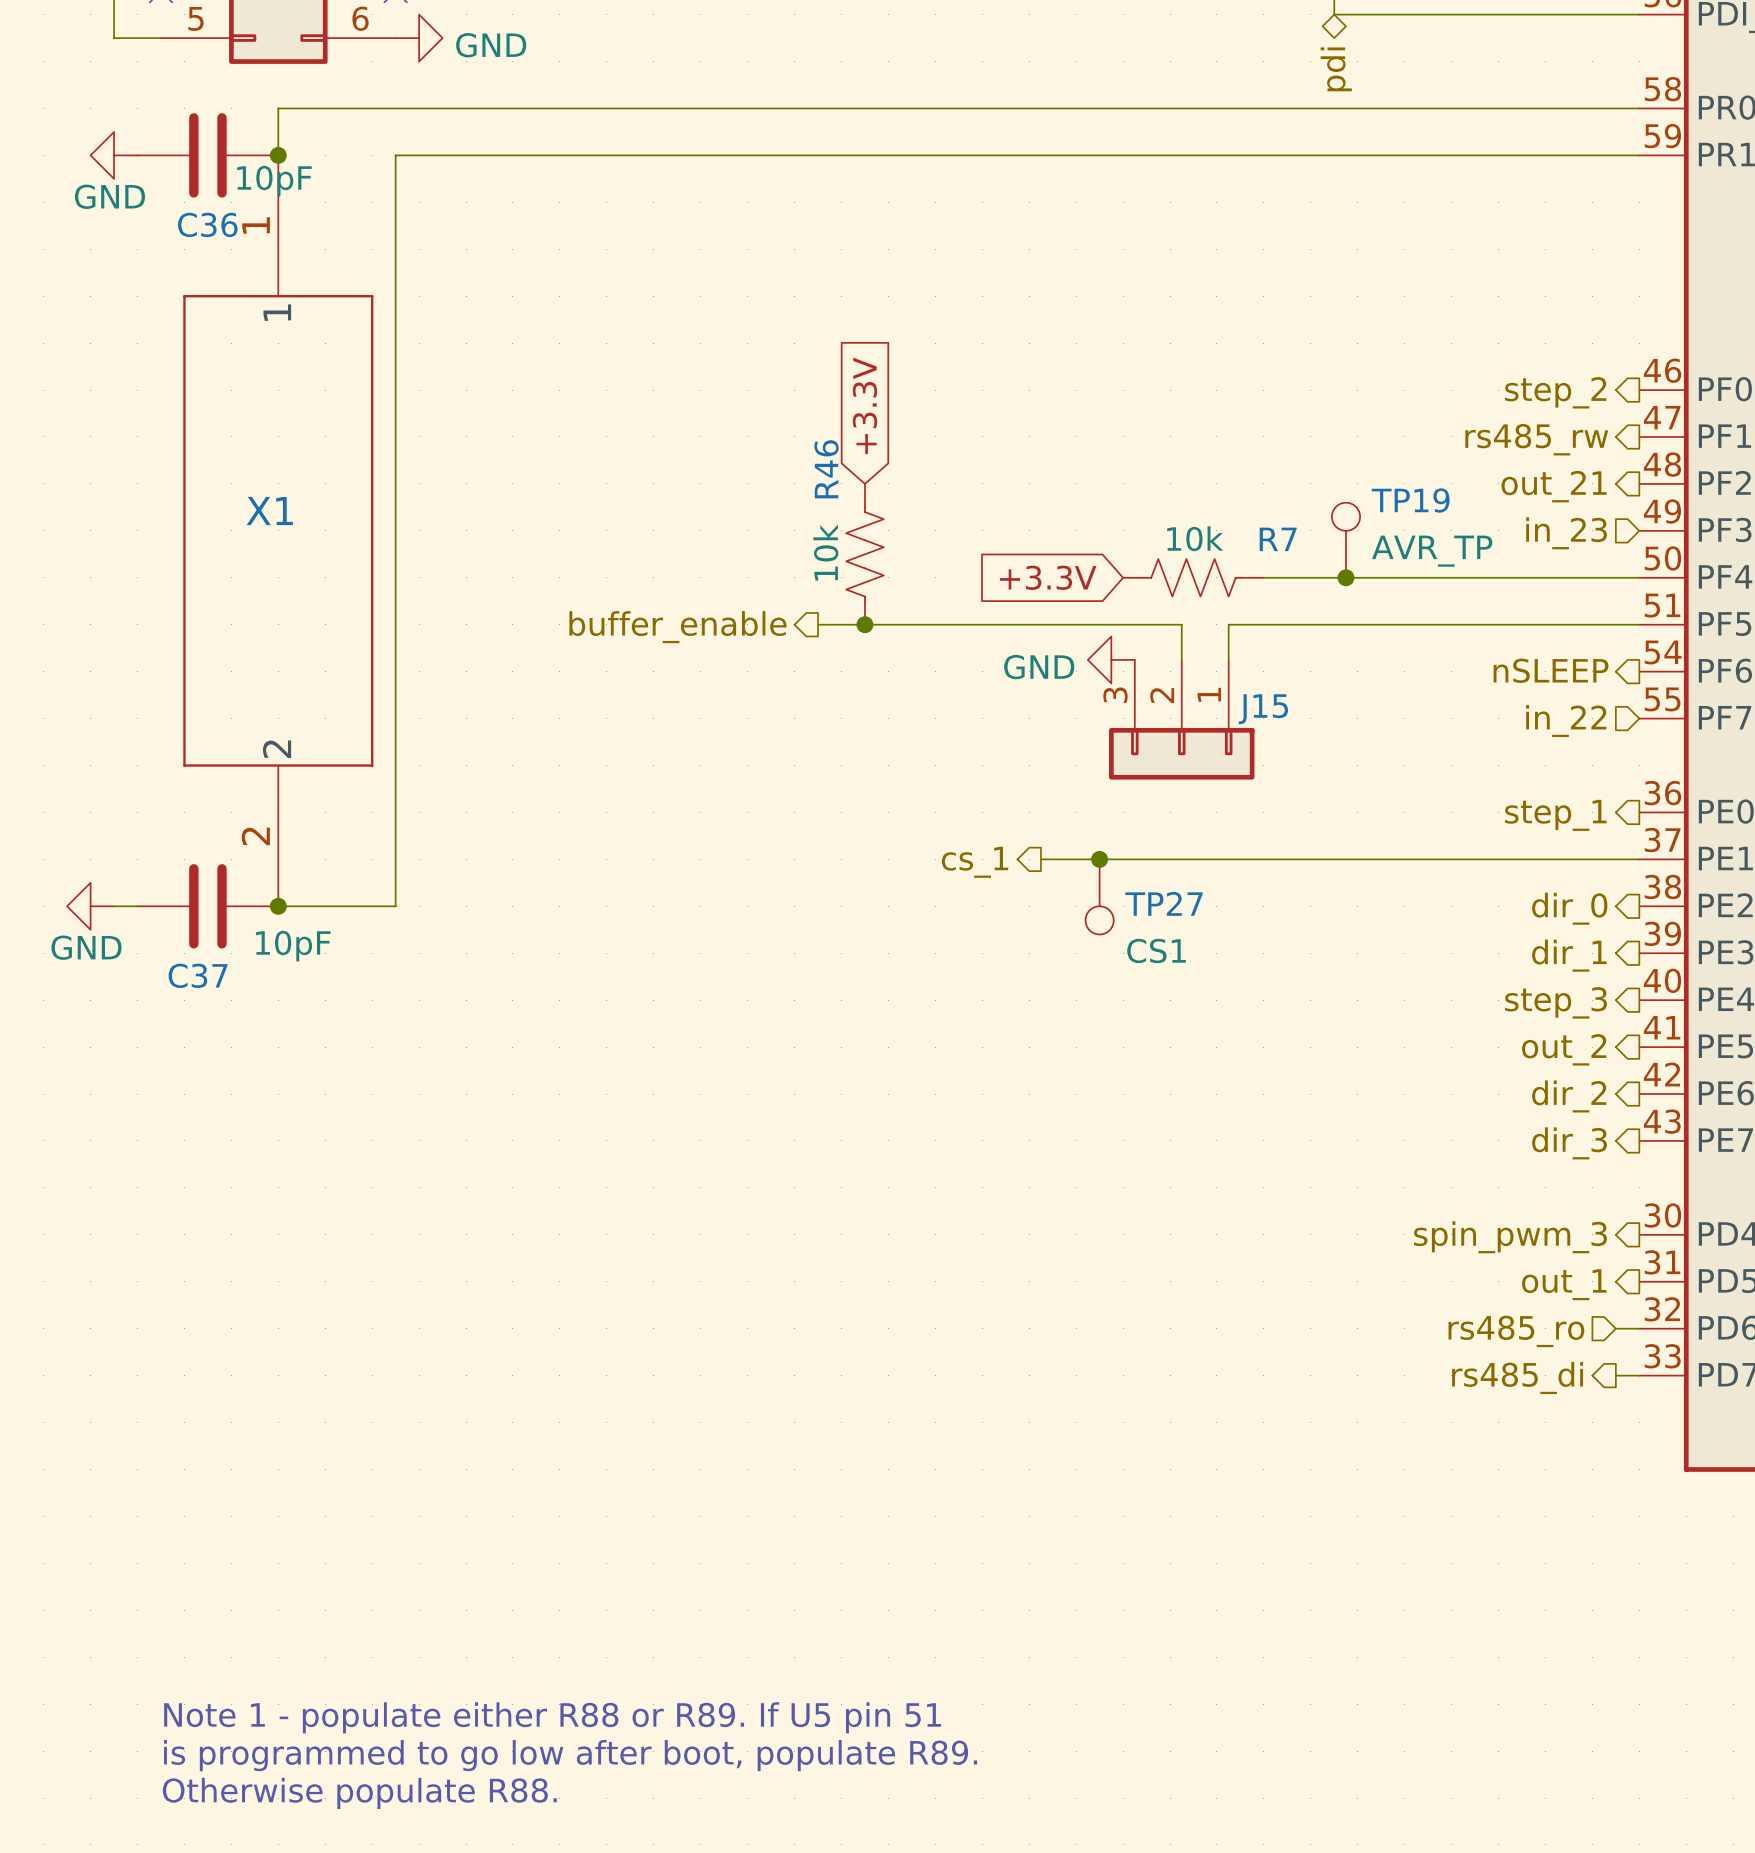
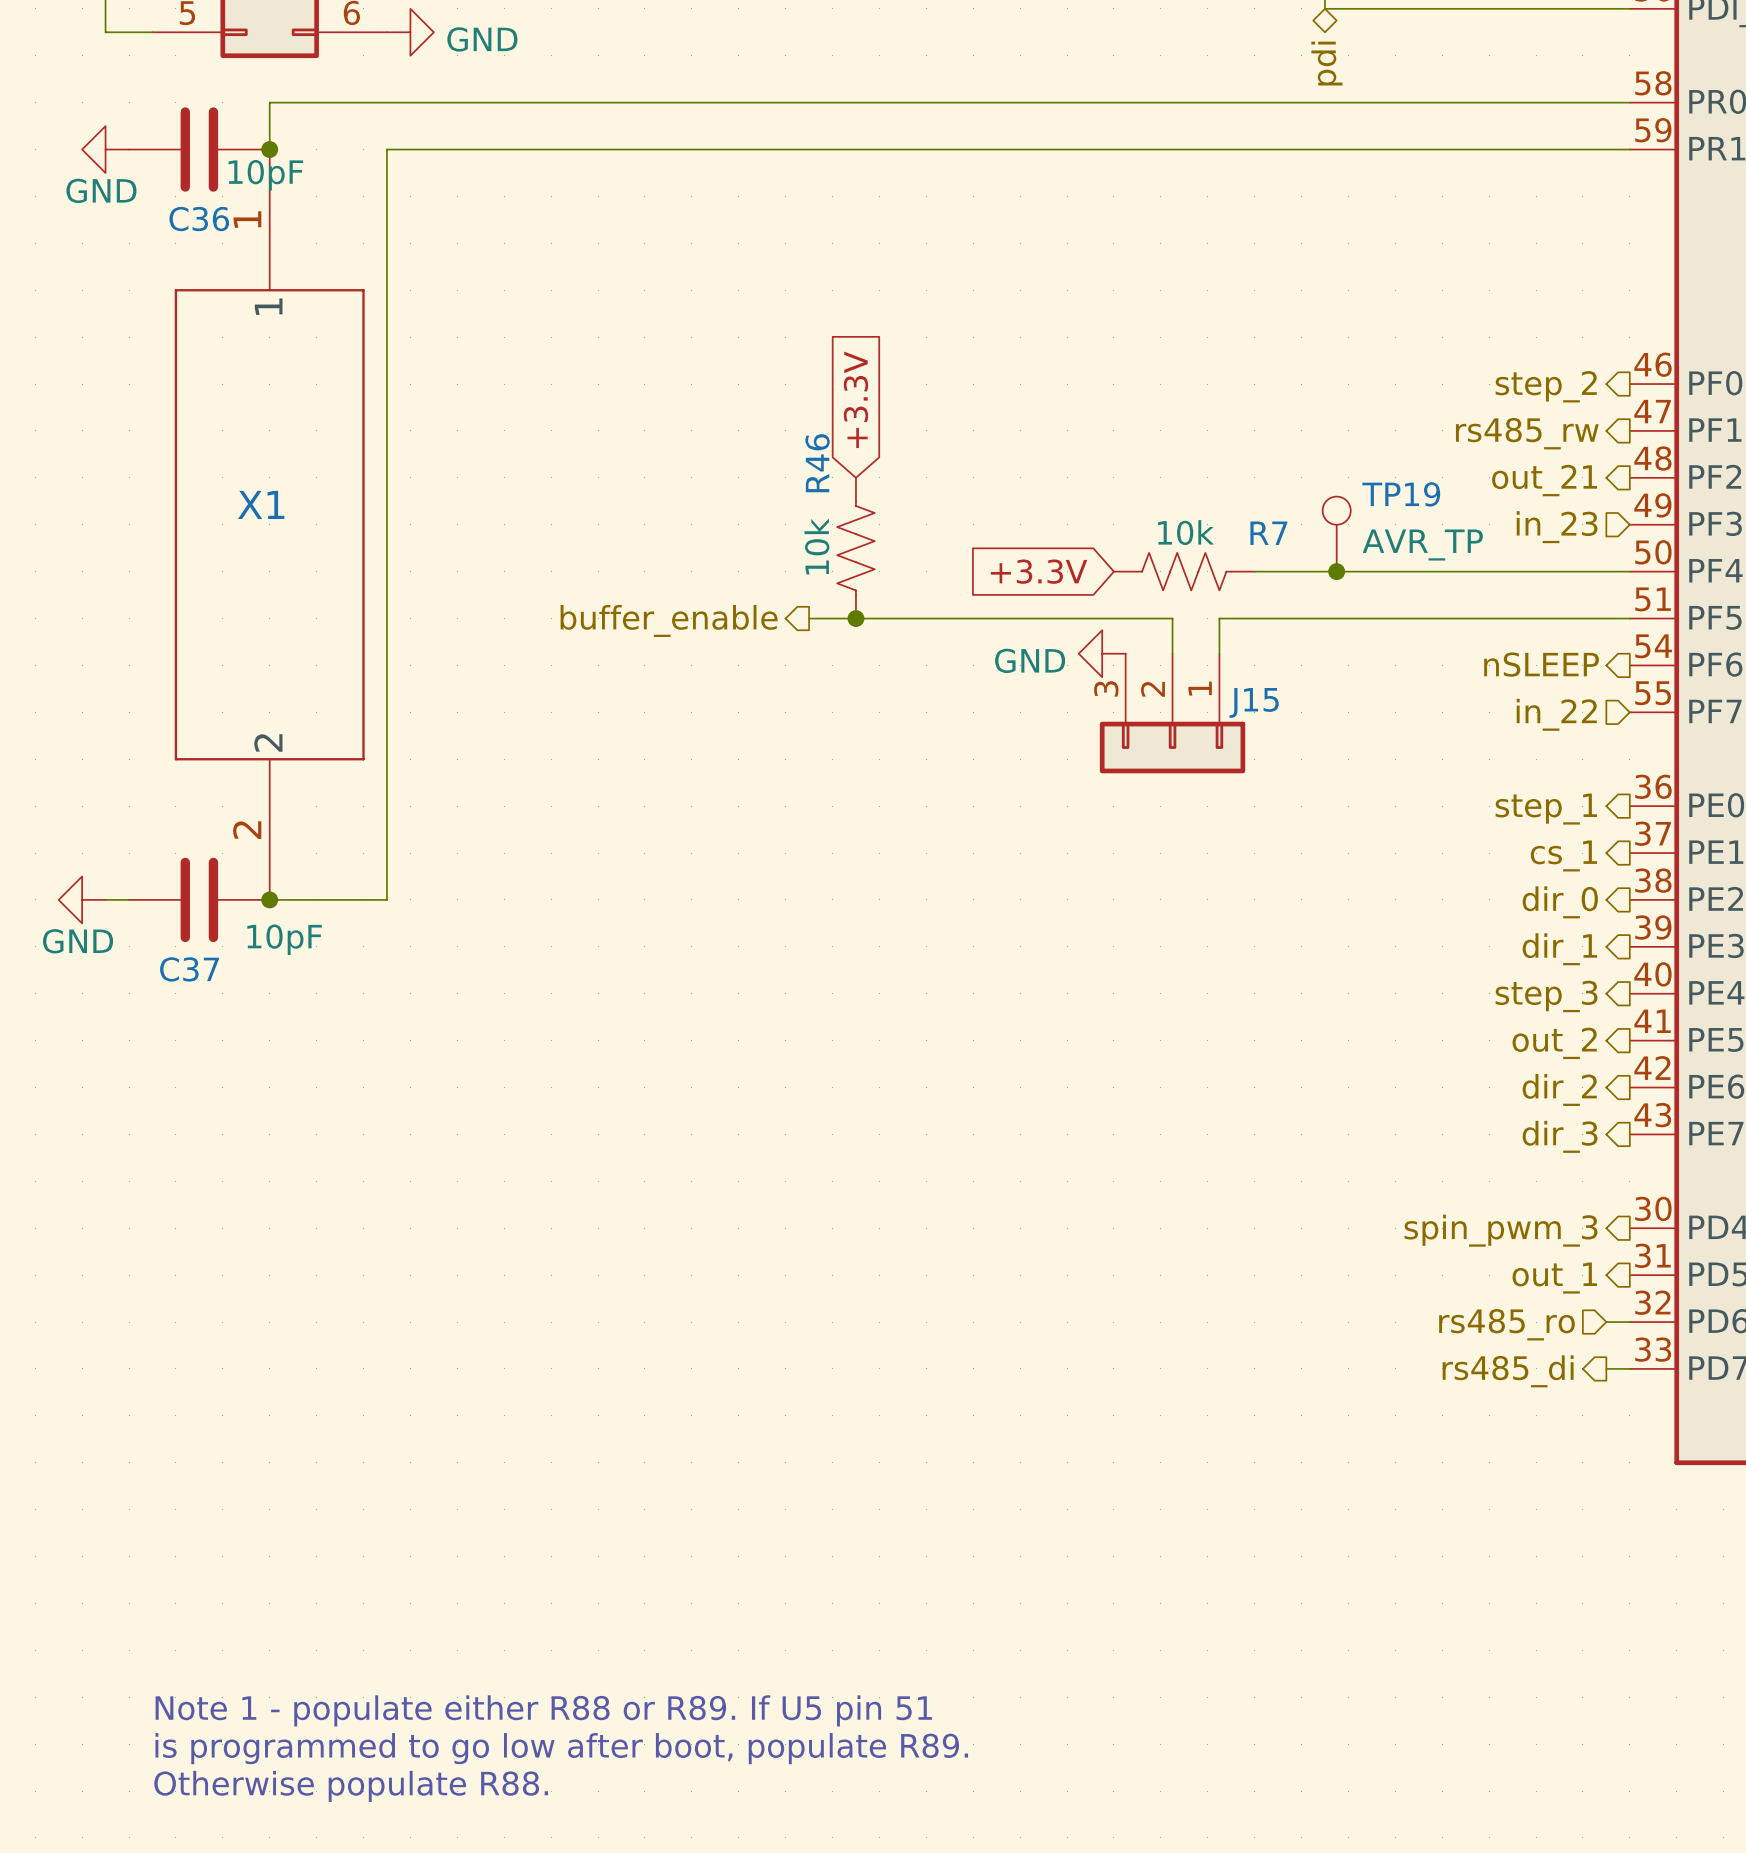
wire: (1040, 859) (1639, 859) -> none
junction: (1099, 859) -> none
hierarchical label: cs_1 (975, 862) -> none
hierarchical label: none -> cs_1 (1563, 855)
TP27: CS1 (1099, 896) -> none

